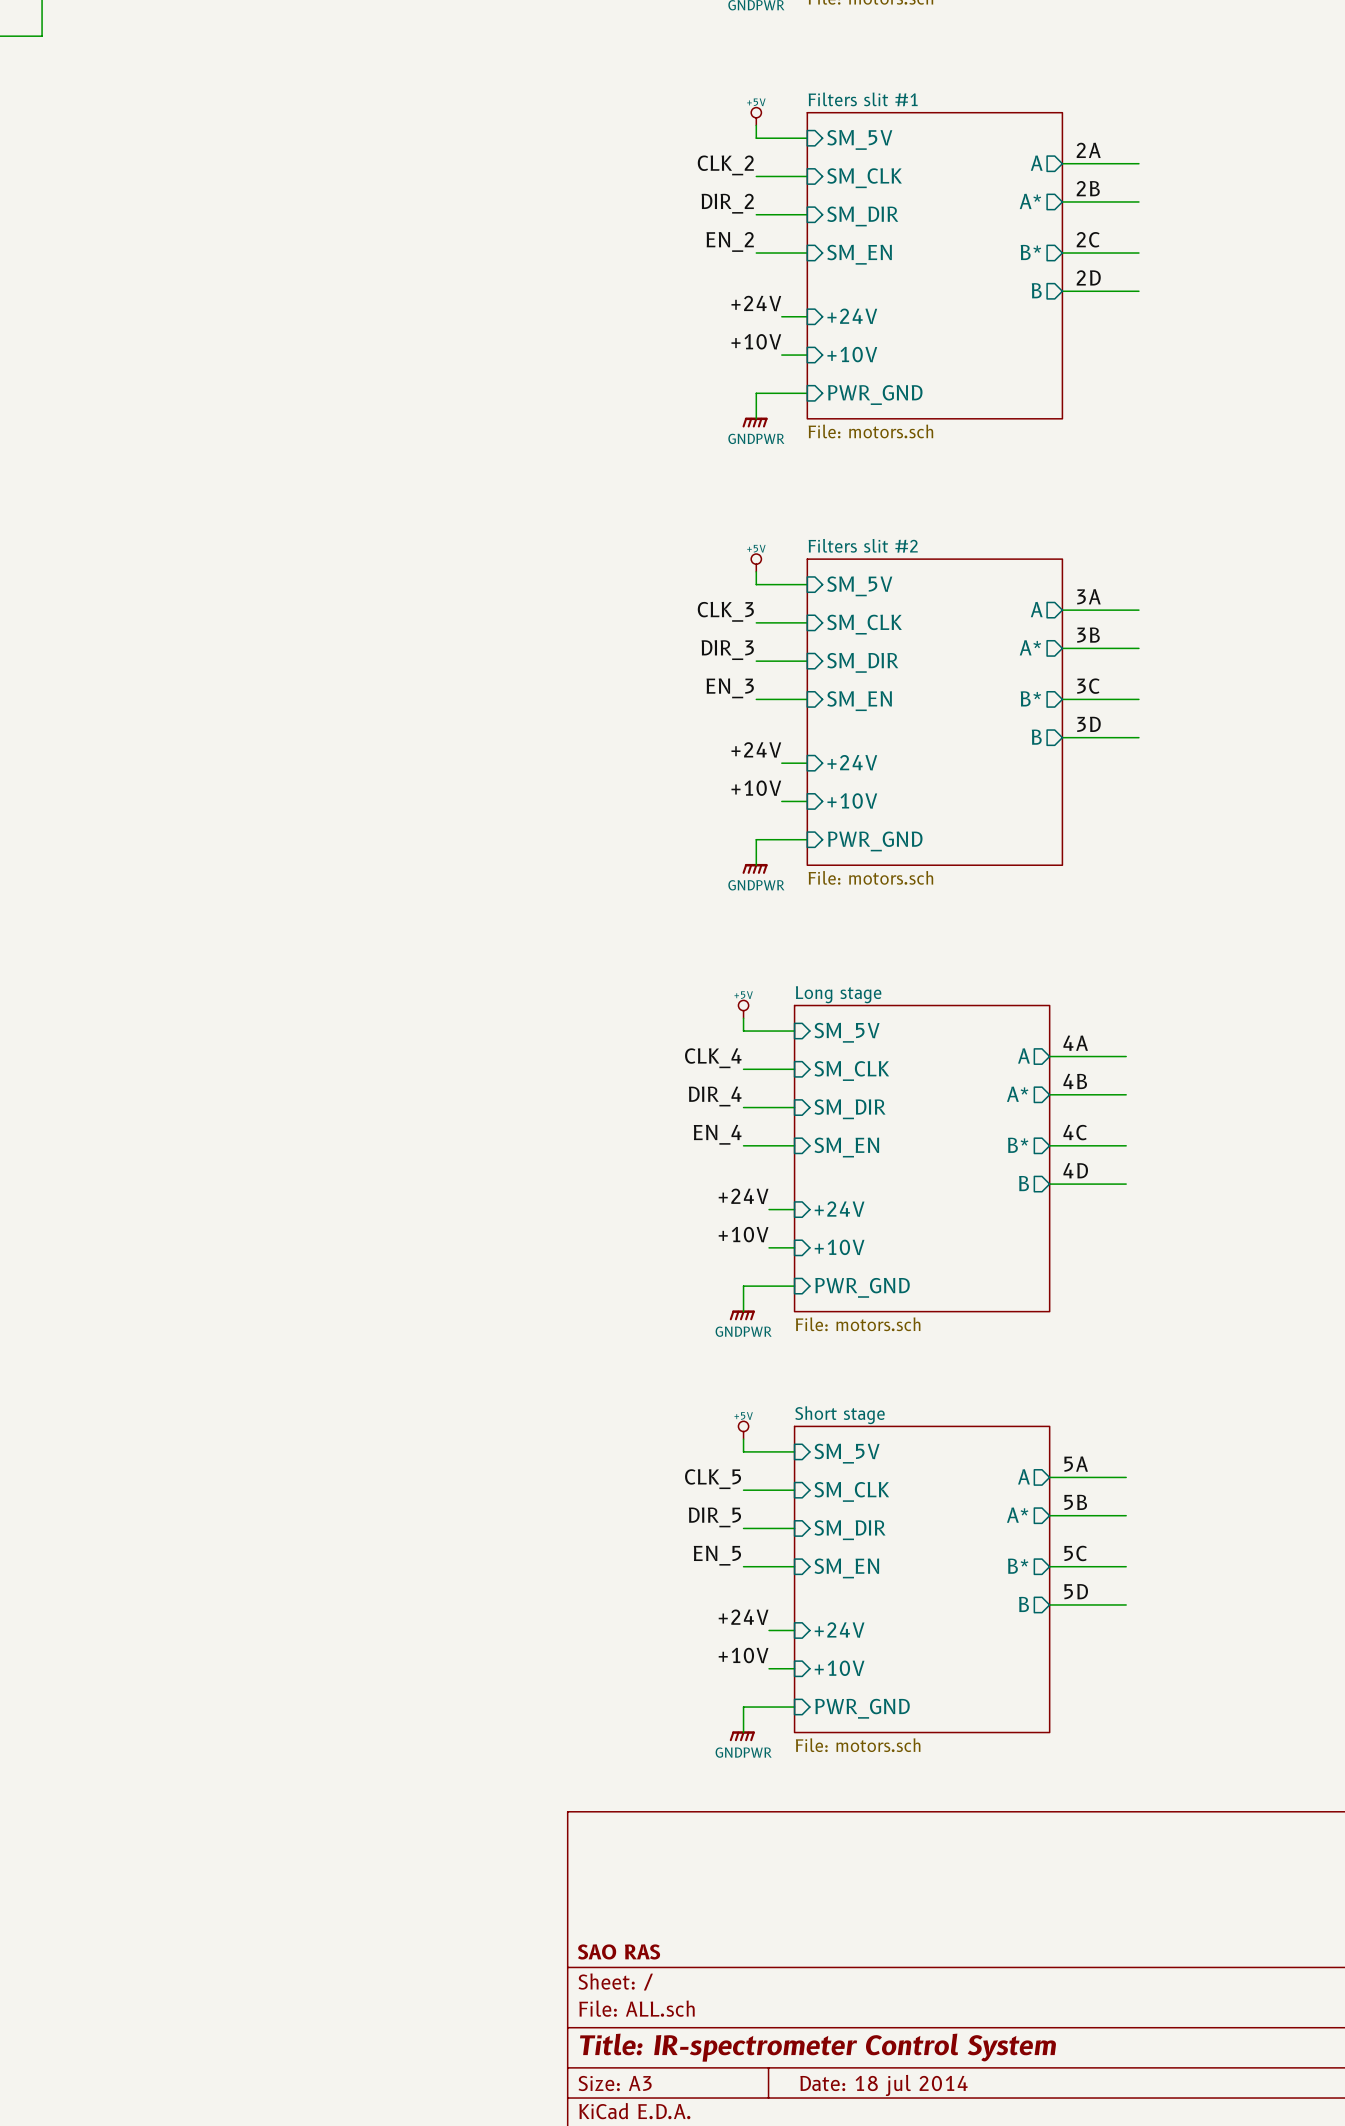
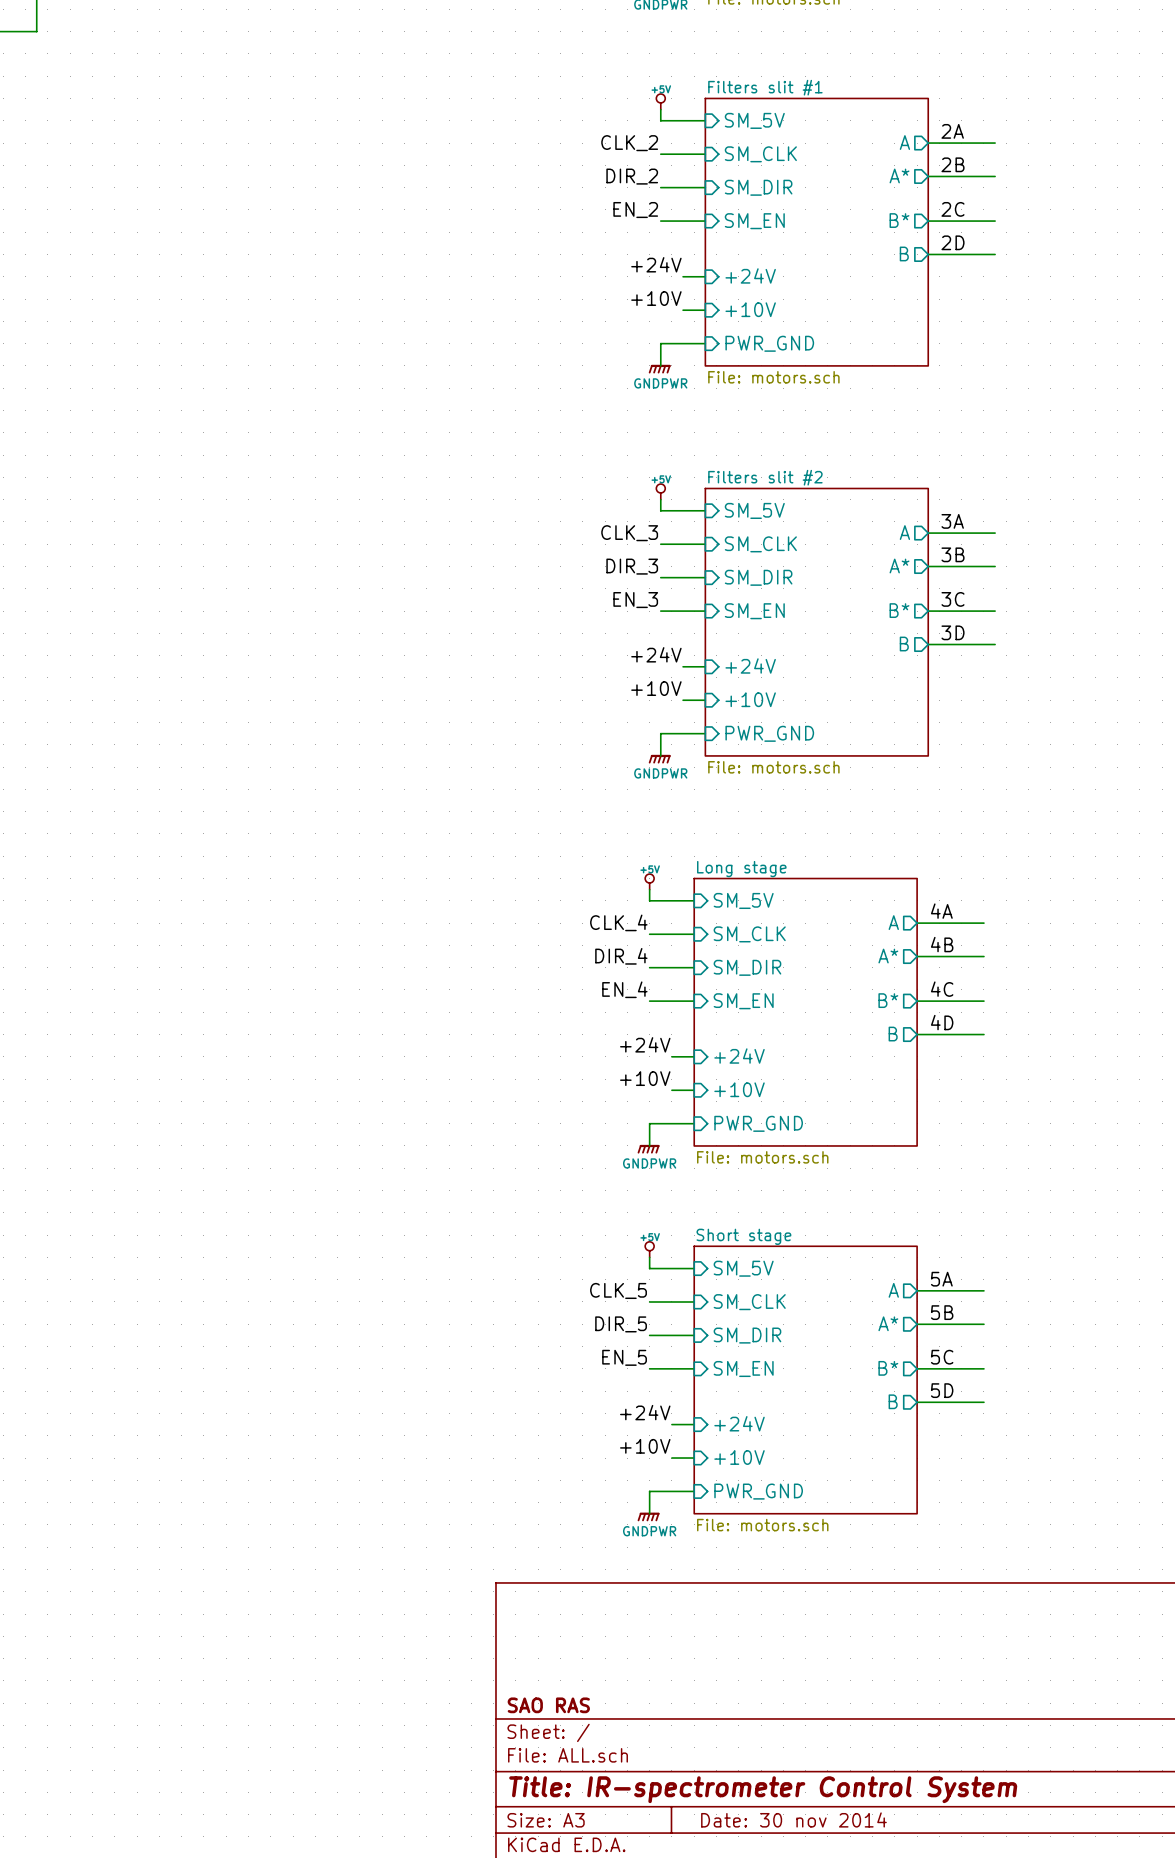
title block: Date: 18 jul 2014 (884, 2085) -> Date: 30 nov 2014 (793, 1819)

